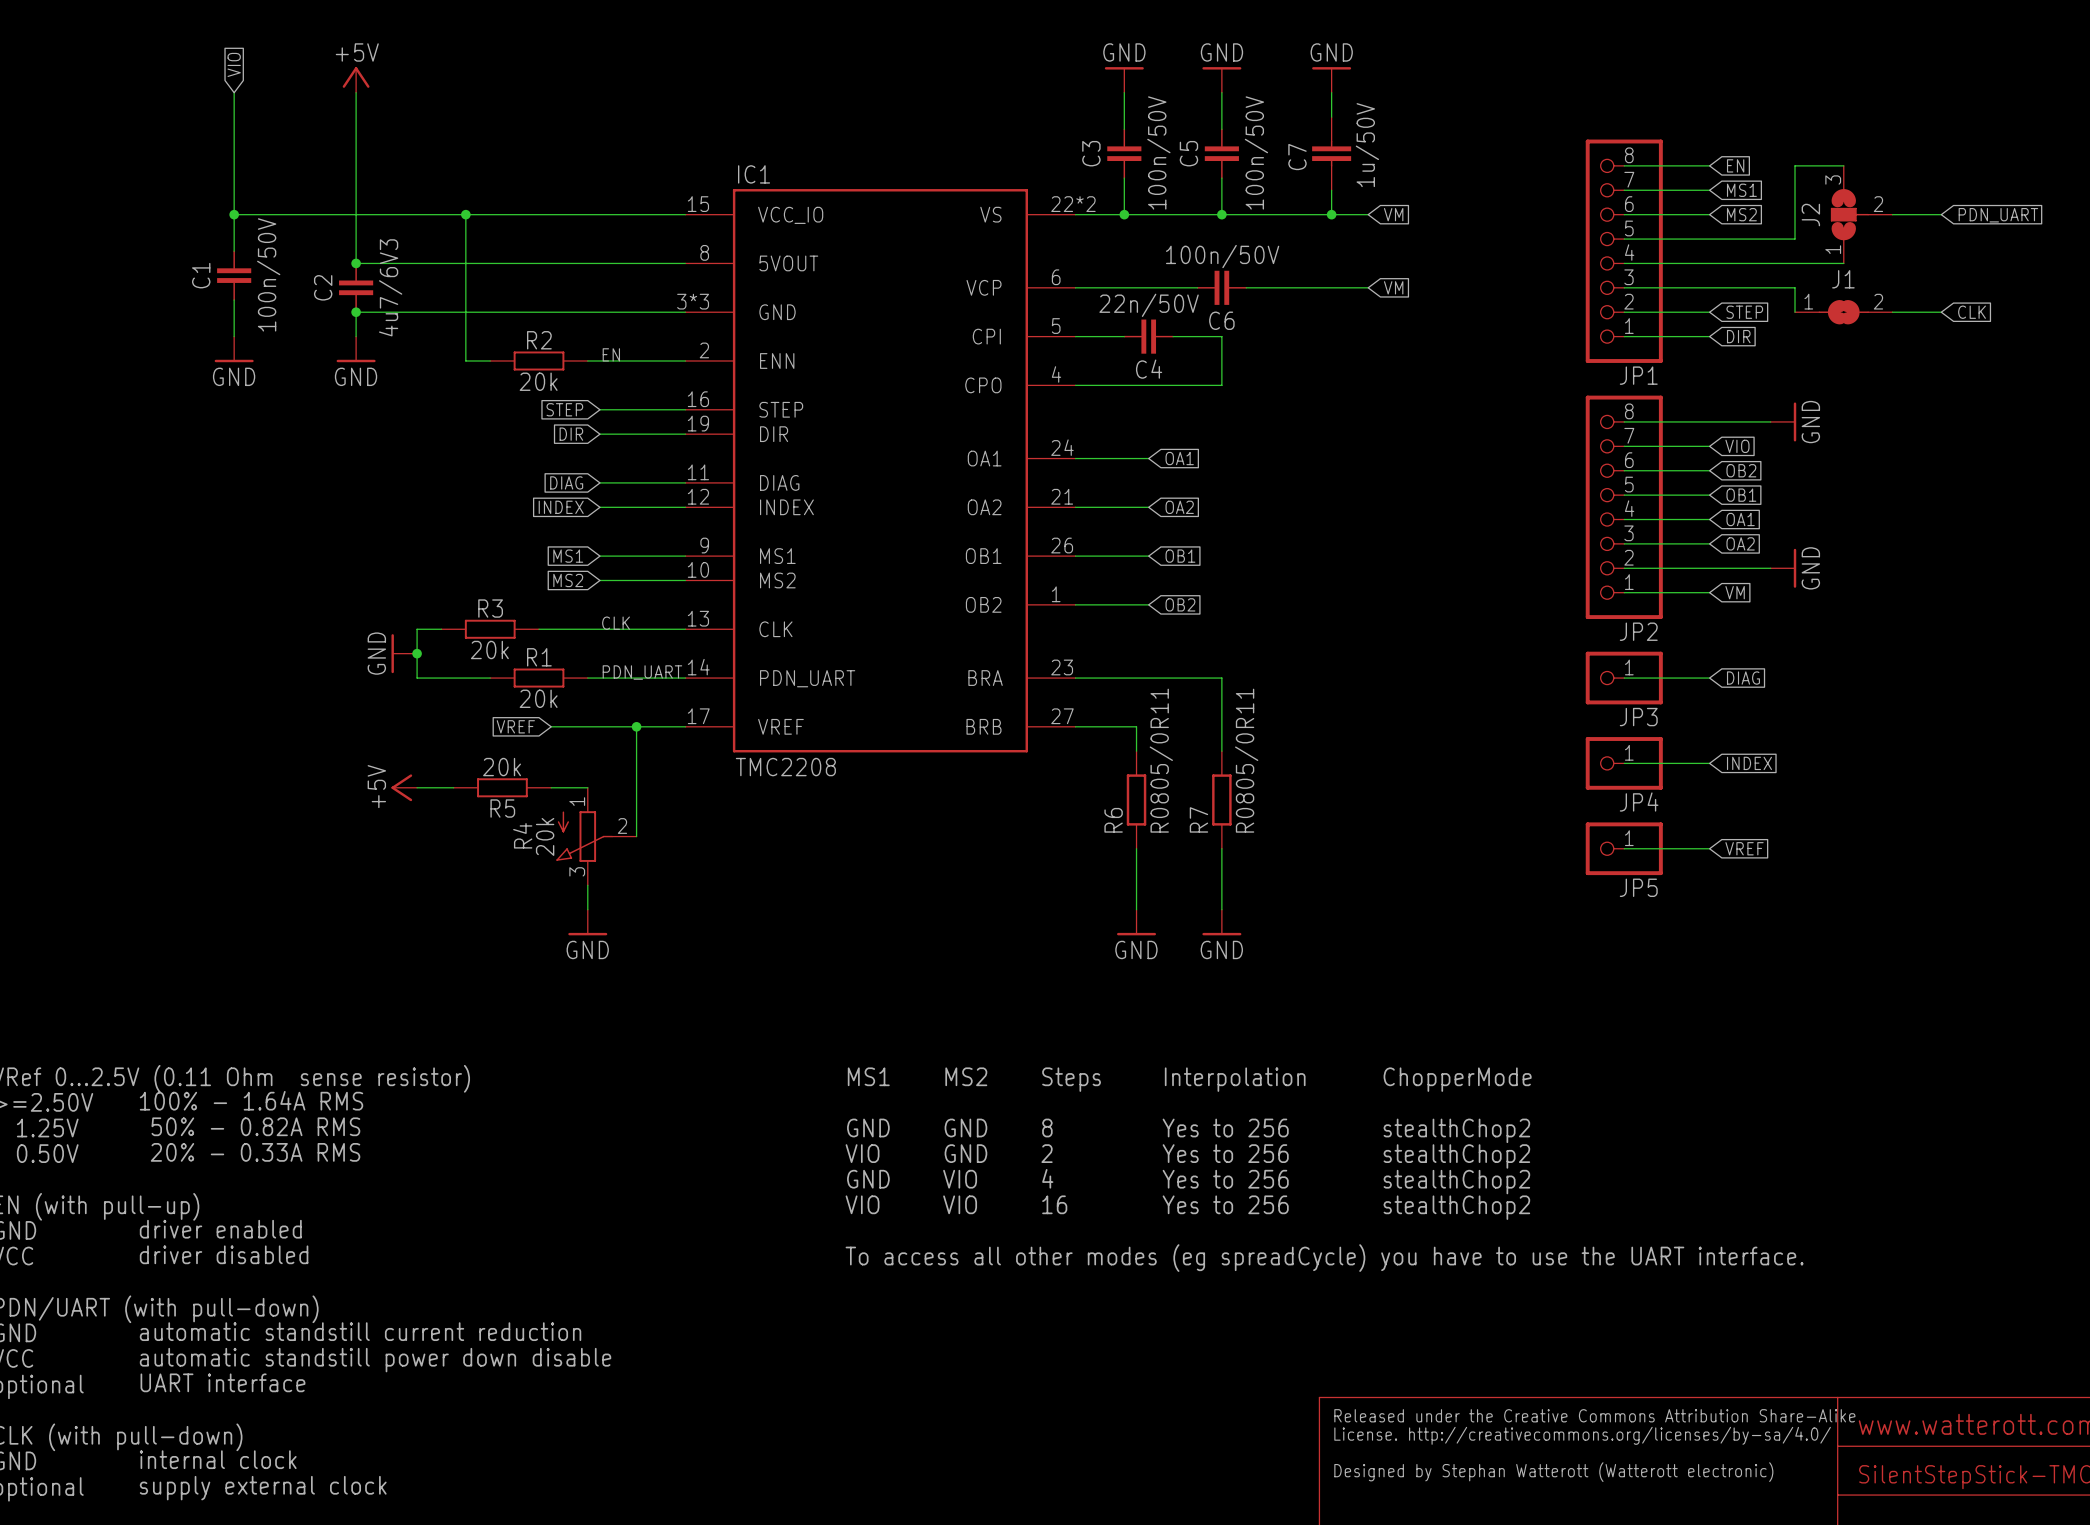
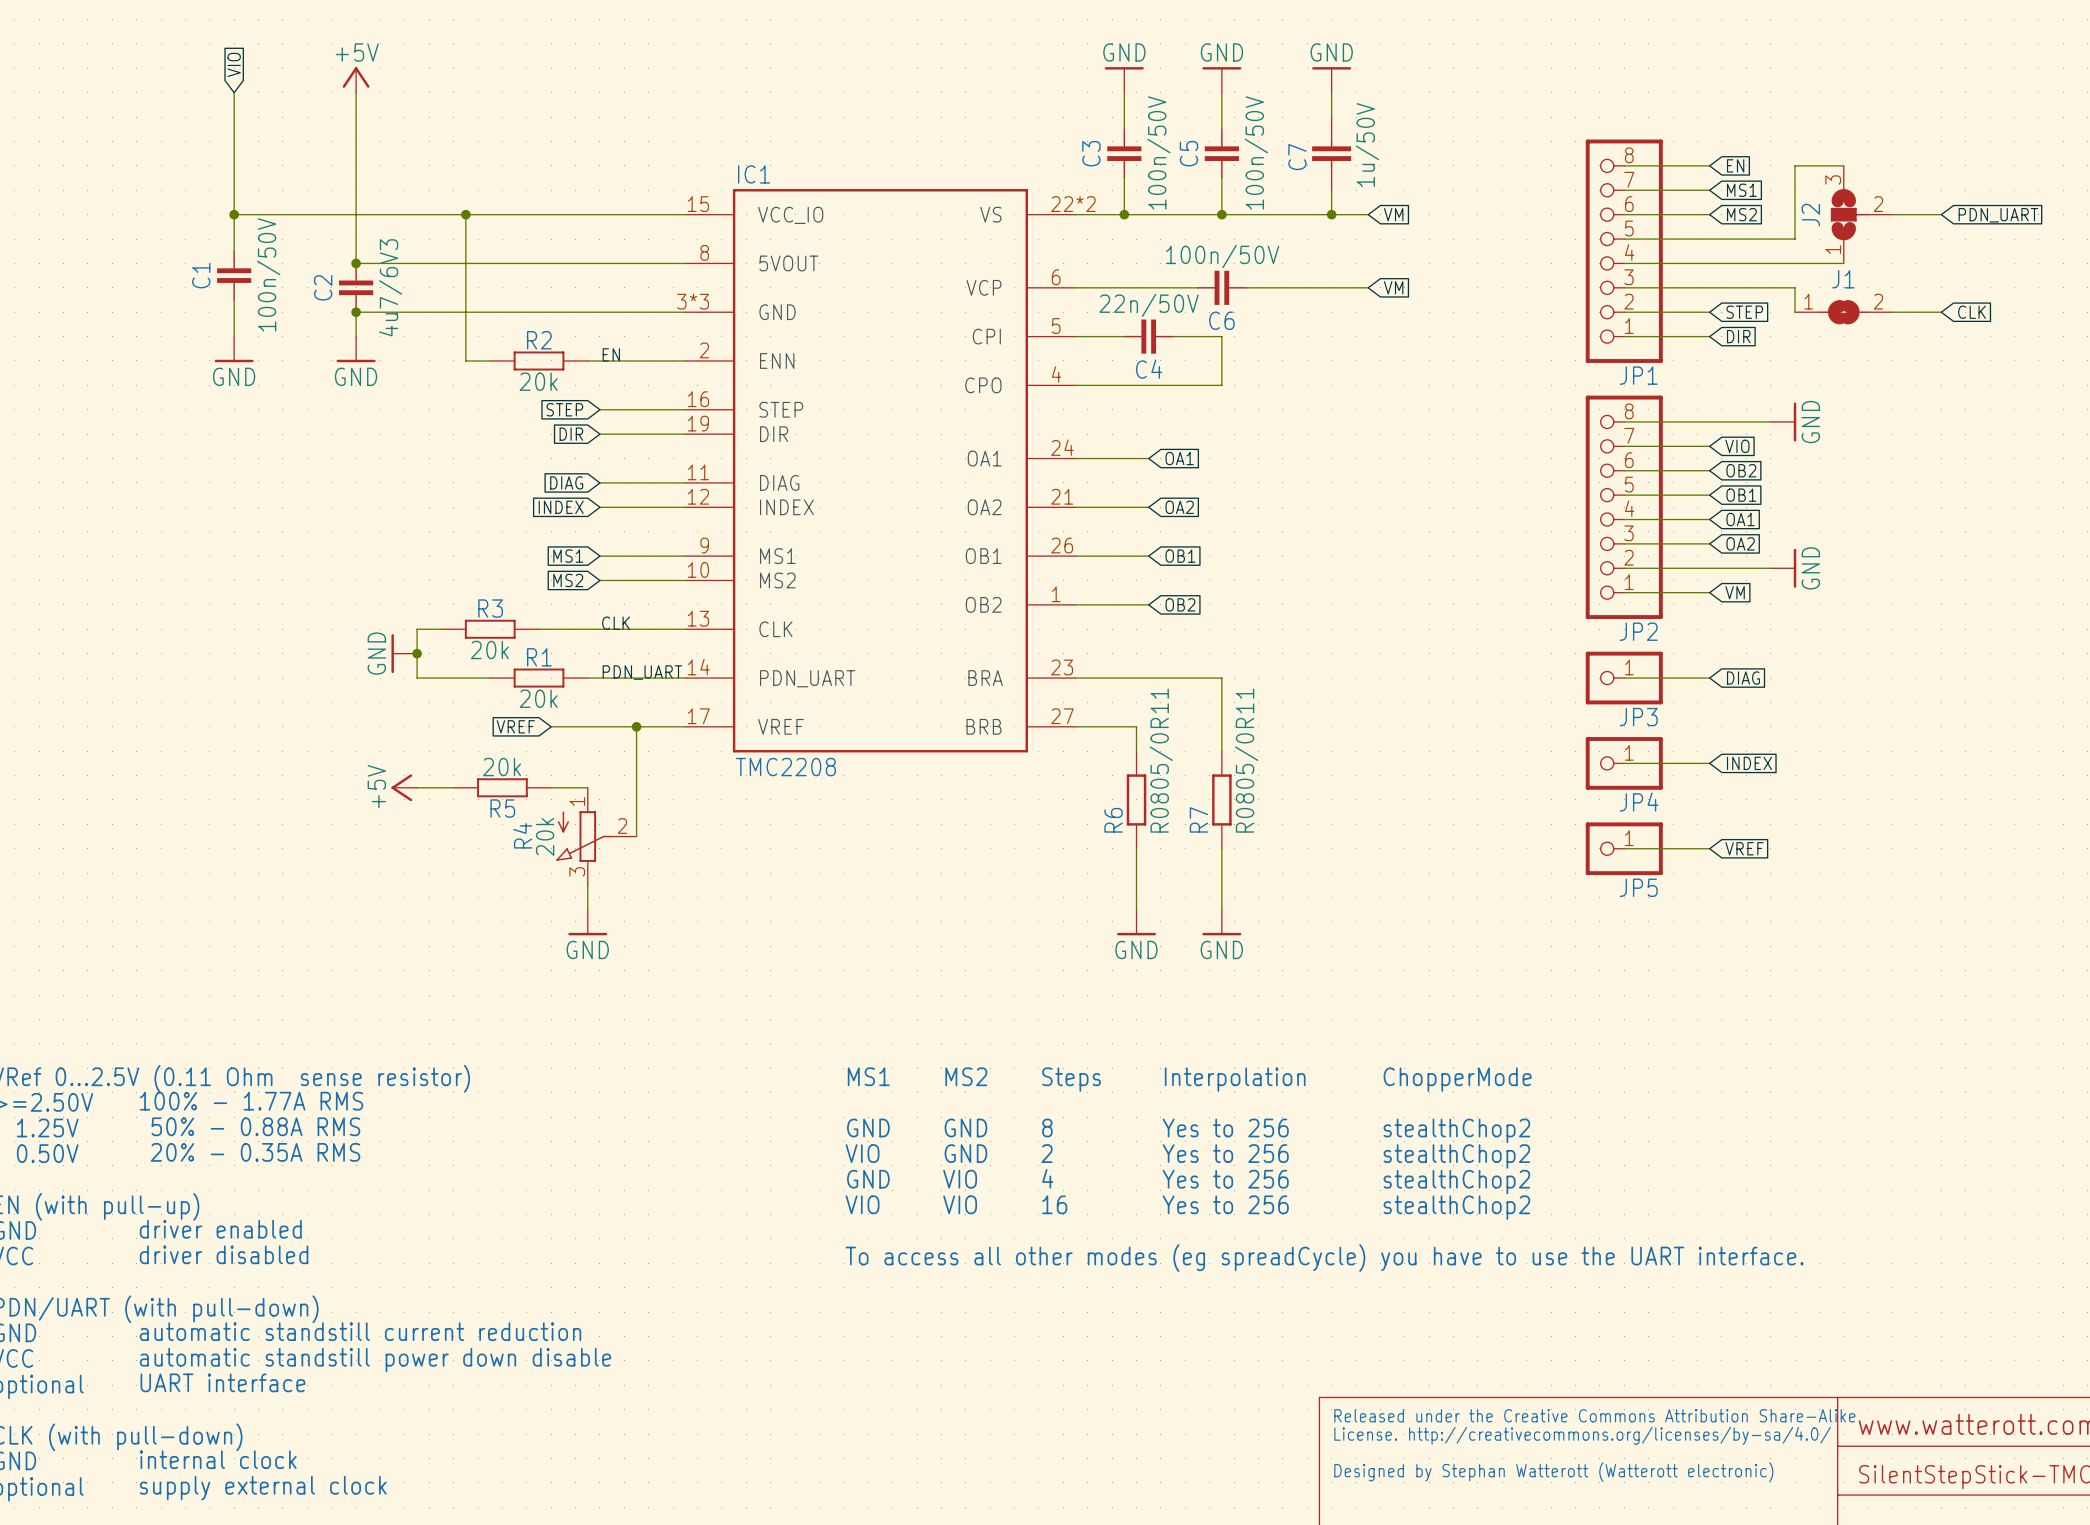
text: 100% - 1.64A RMS (251, 1100) -> 100% - 1.77A RMS (251, 1101)
text: 50% - 0.82A RMS (255, 1126) -> 50% - 0.88A RMS (255, 1126)
text: 20% - 0.33A RMS (255, 1152) -> 20% - 0.35A RMS (255, 1152)

